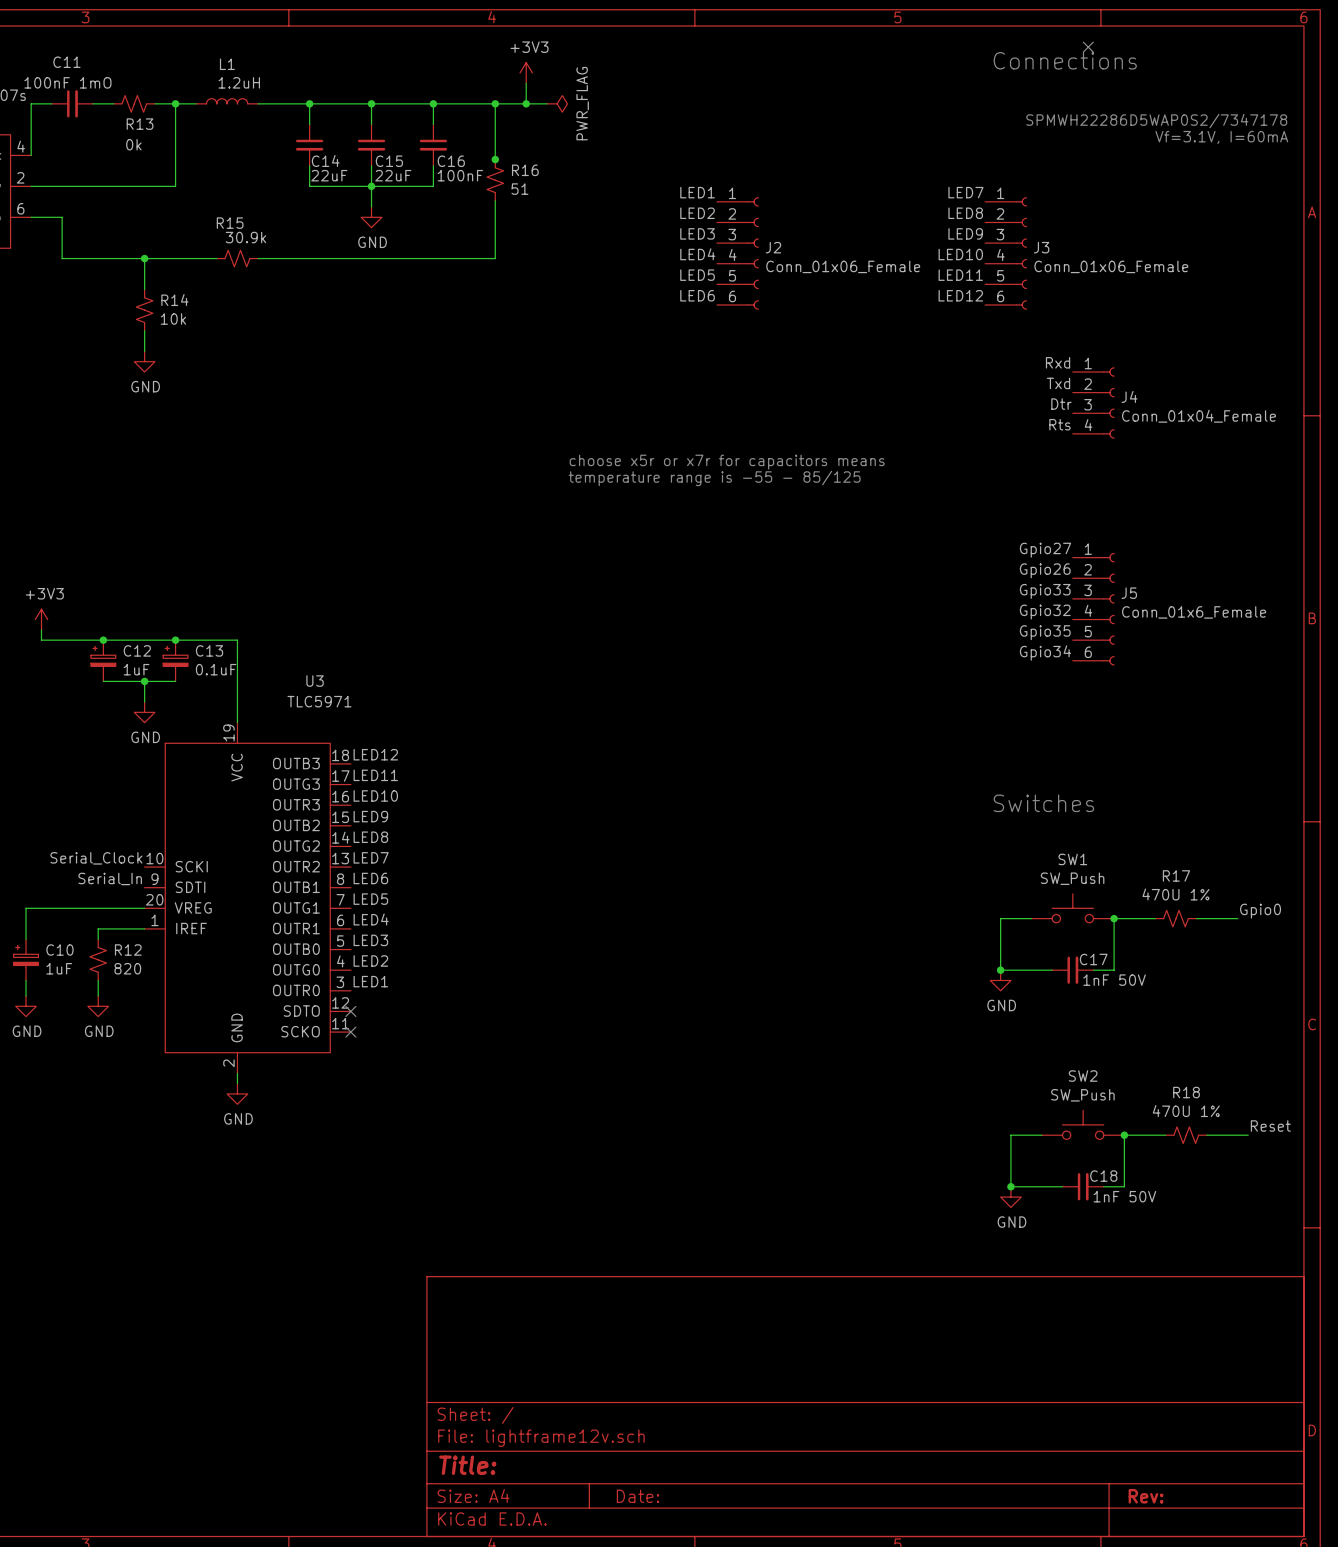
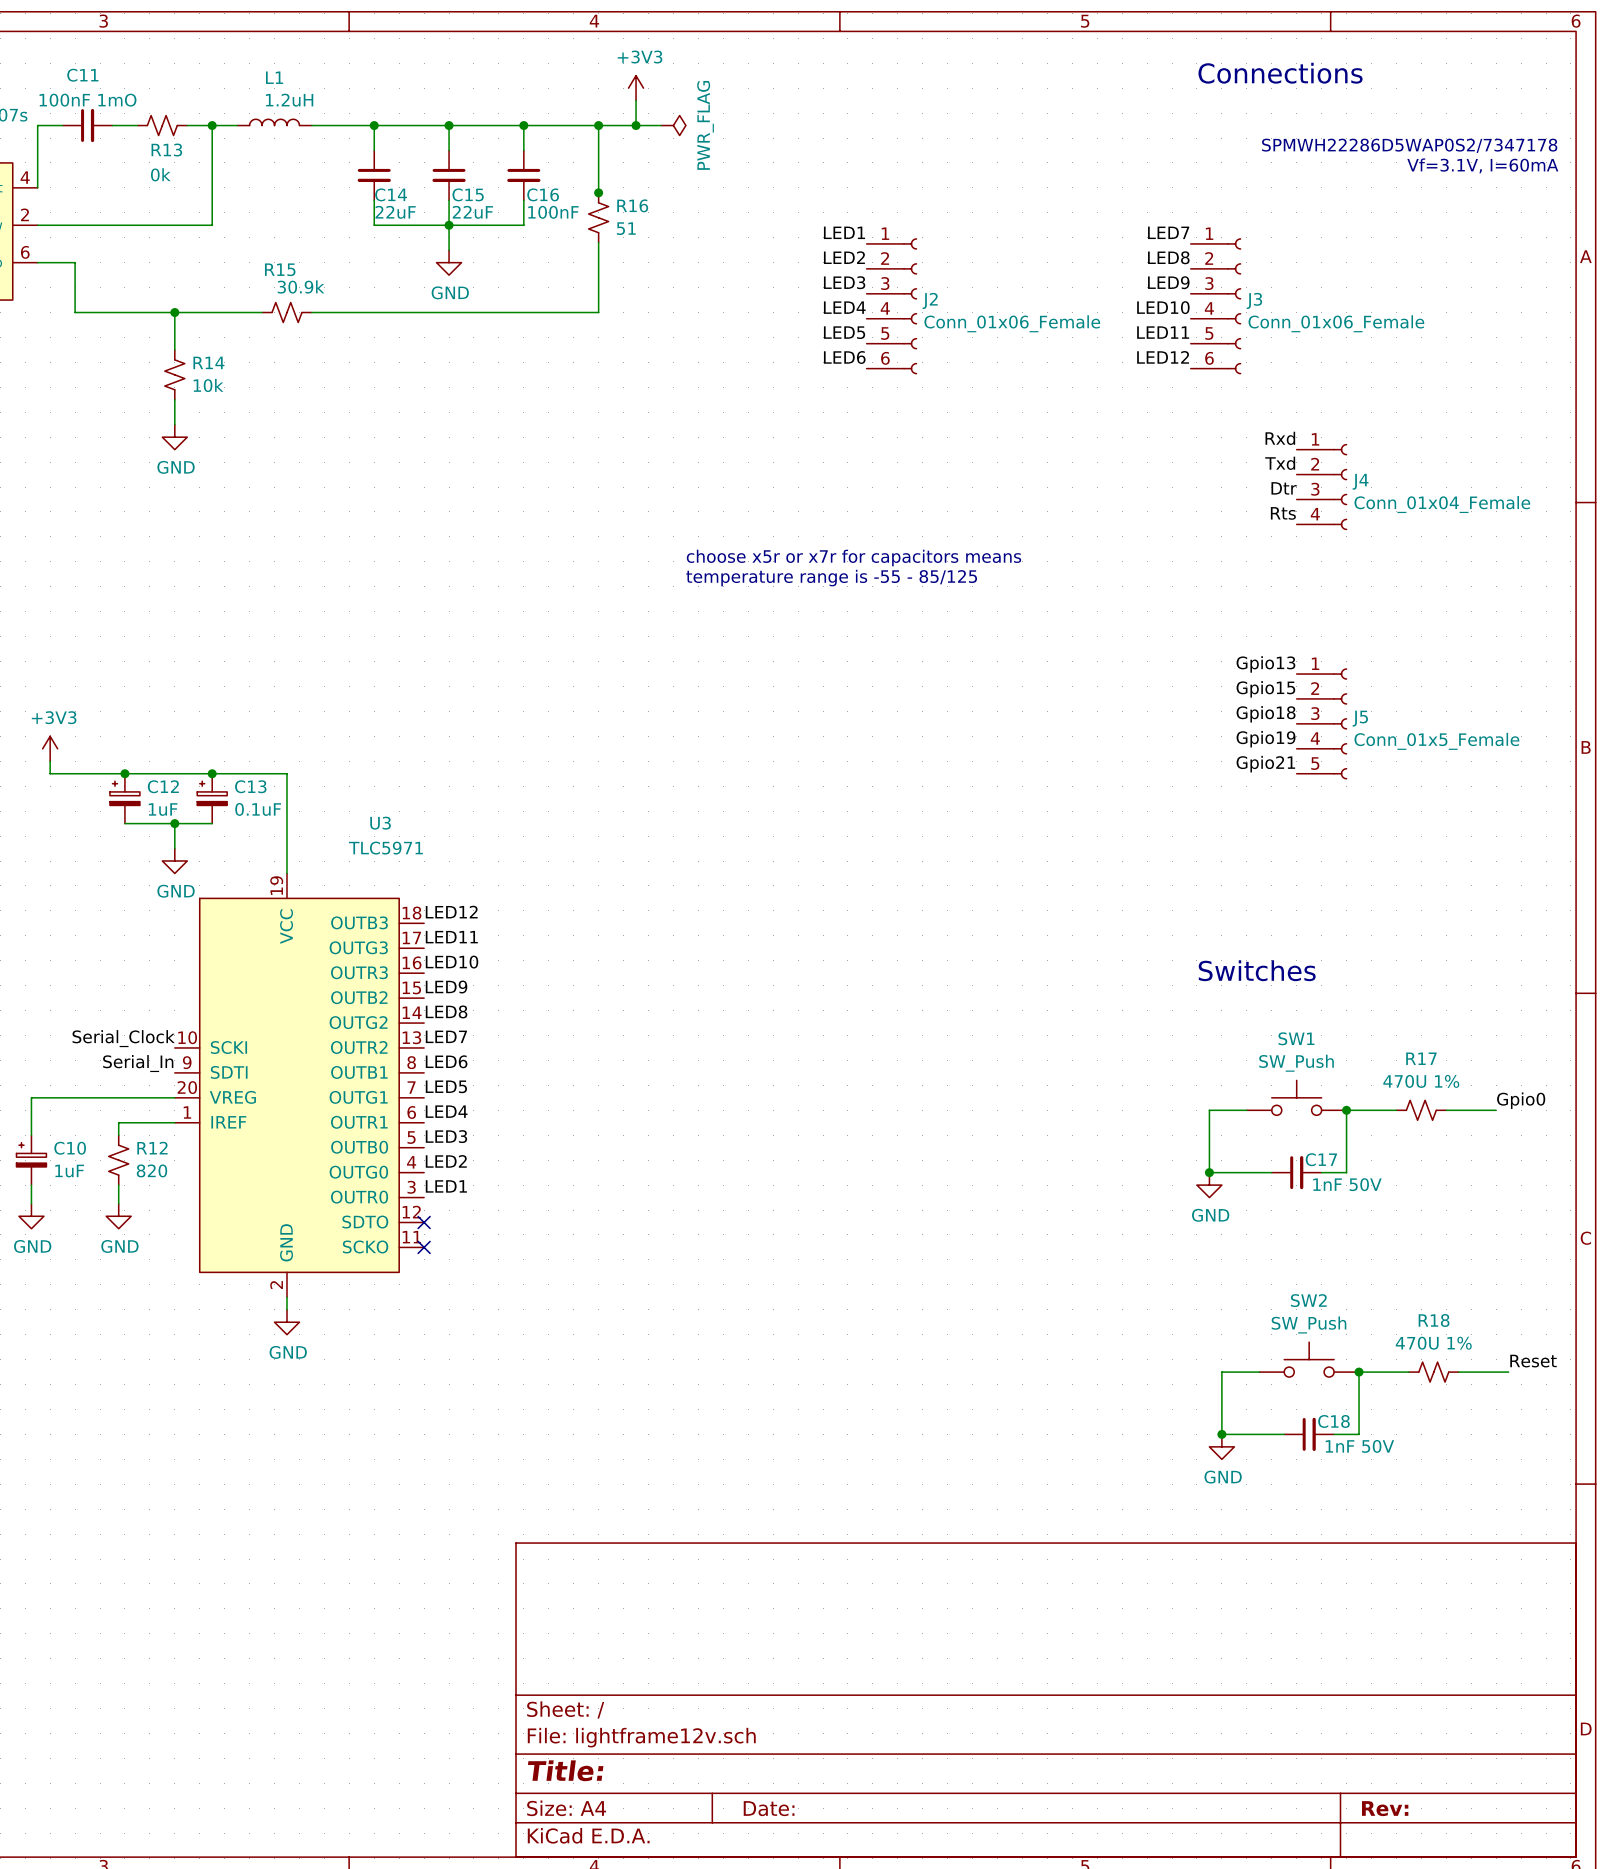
no-connect mark: (1088, 47) -> none
label: Gpio27 (1045, 550) -> Gpio13 (1265, 664)
J5 symbol: [1072, 552, 1115, 666] -> [1296, 668, 1348, 780]
label: Gpio26 (1045, 570) -> Gpio15 (1265, 689)
label: Gpio33 (1045, 591) -> Gpio18 (1266, 714)
label: Gpio32 (1045, 612) -> Gpio19 (1266, 739)
J5 value: Conn_01x6_Female (1194, 612) -> Conn_01x5_Female (1436, 741)
label: Gpio35 (1045, 632) -> Gpio21 (1265, 764)
label: Gpio34 (1045, 653) -> none

